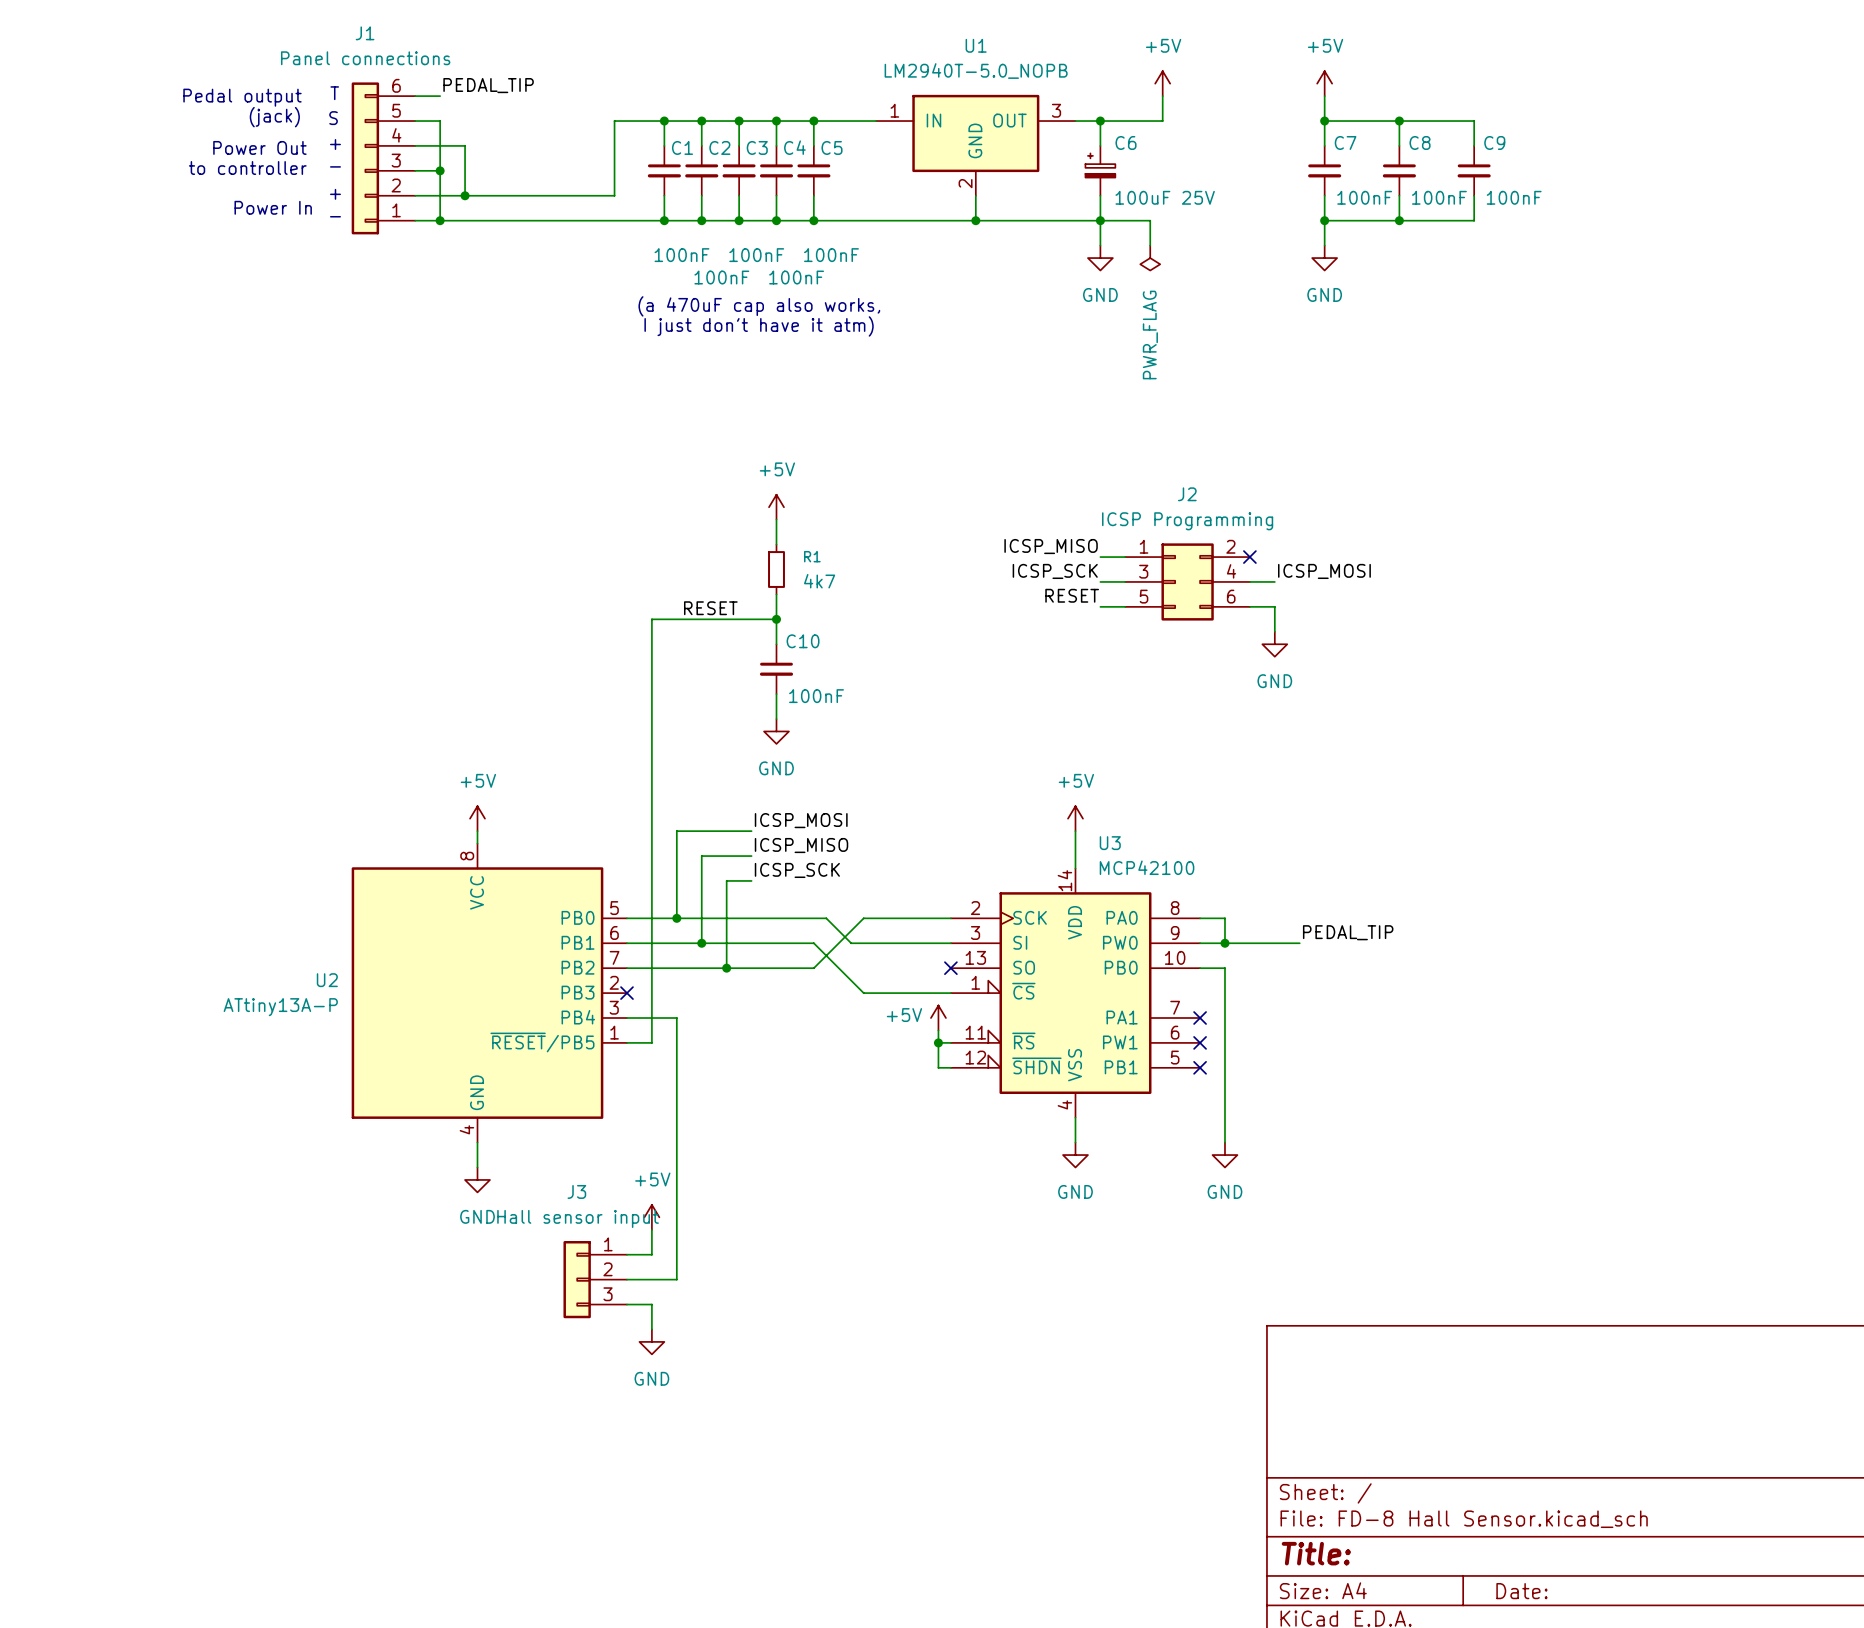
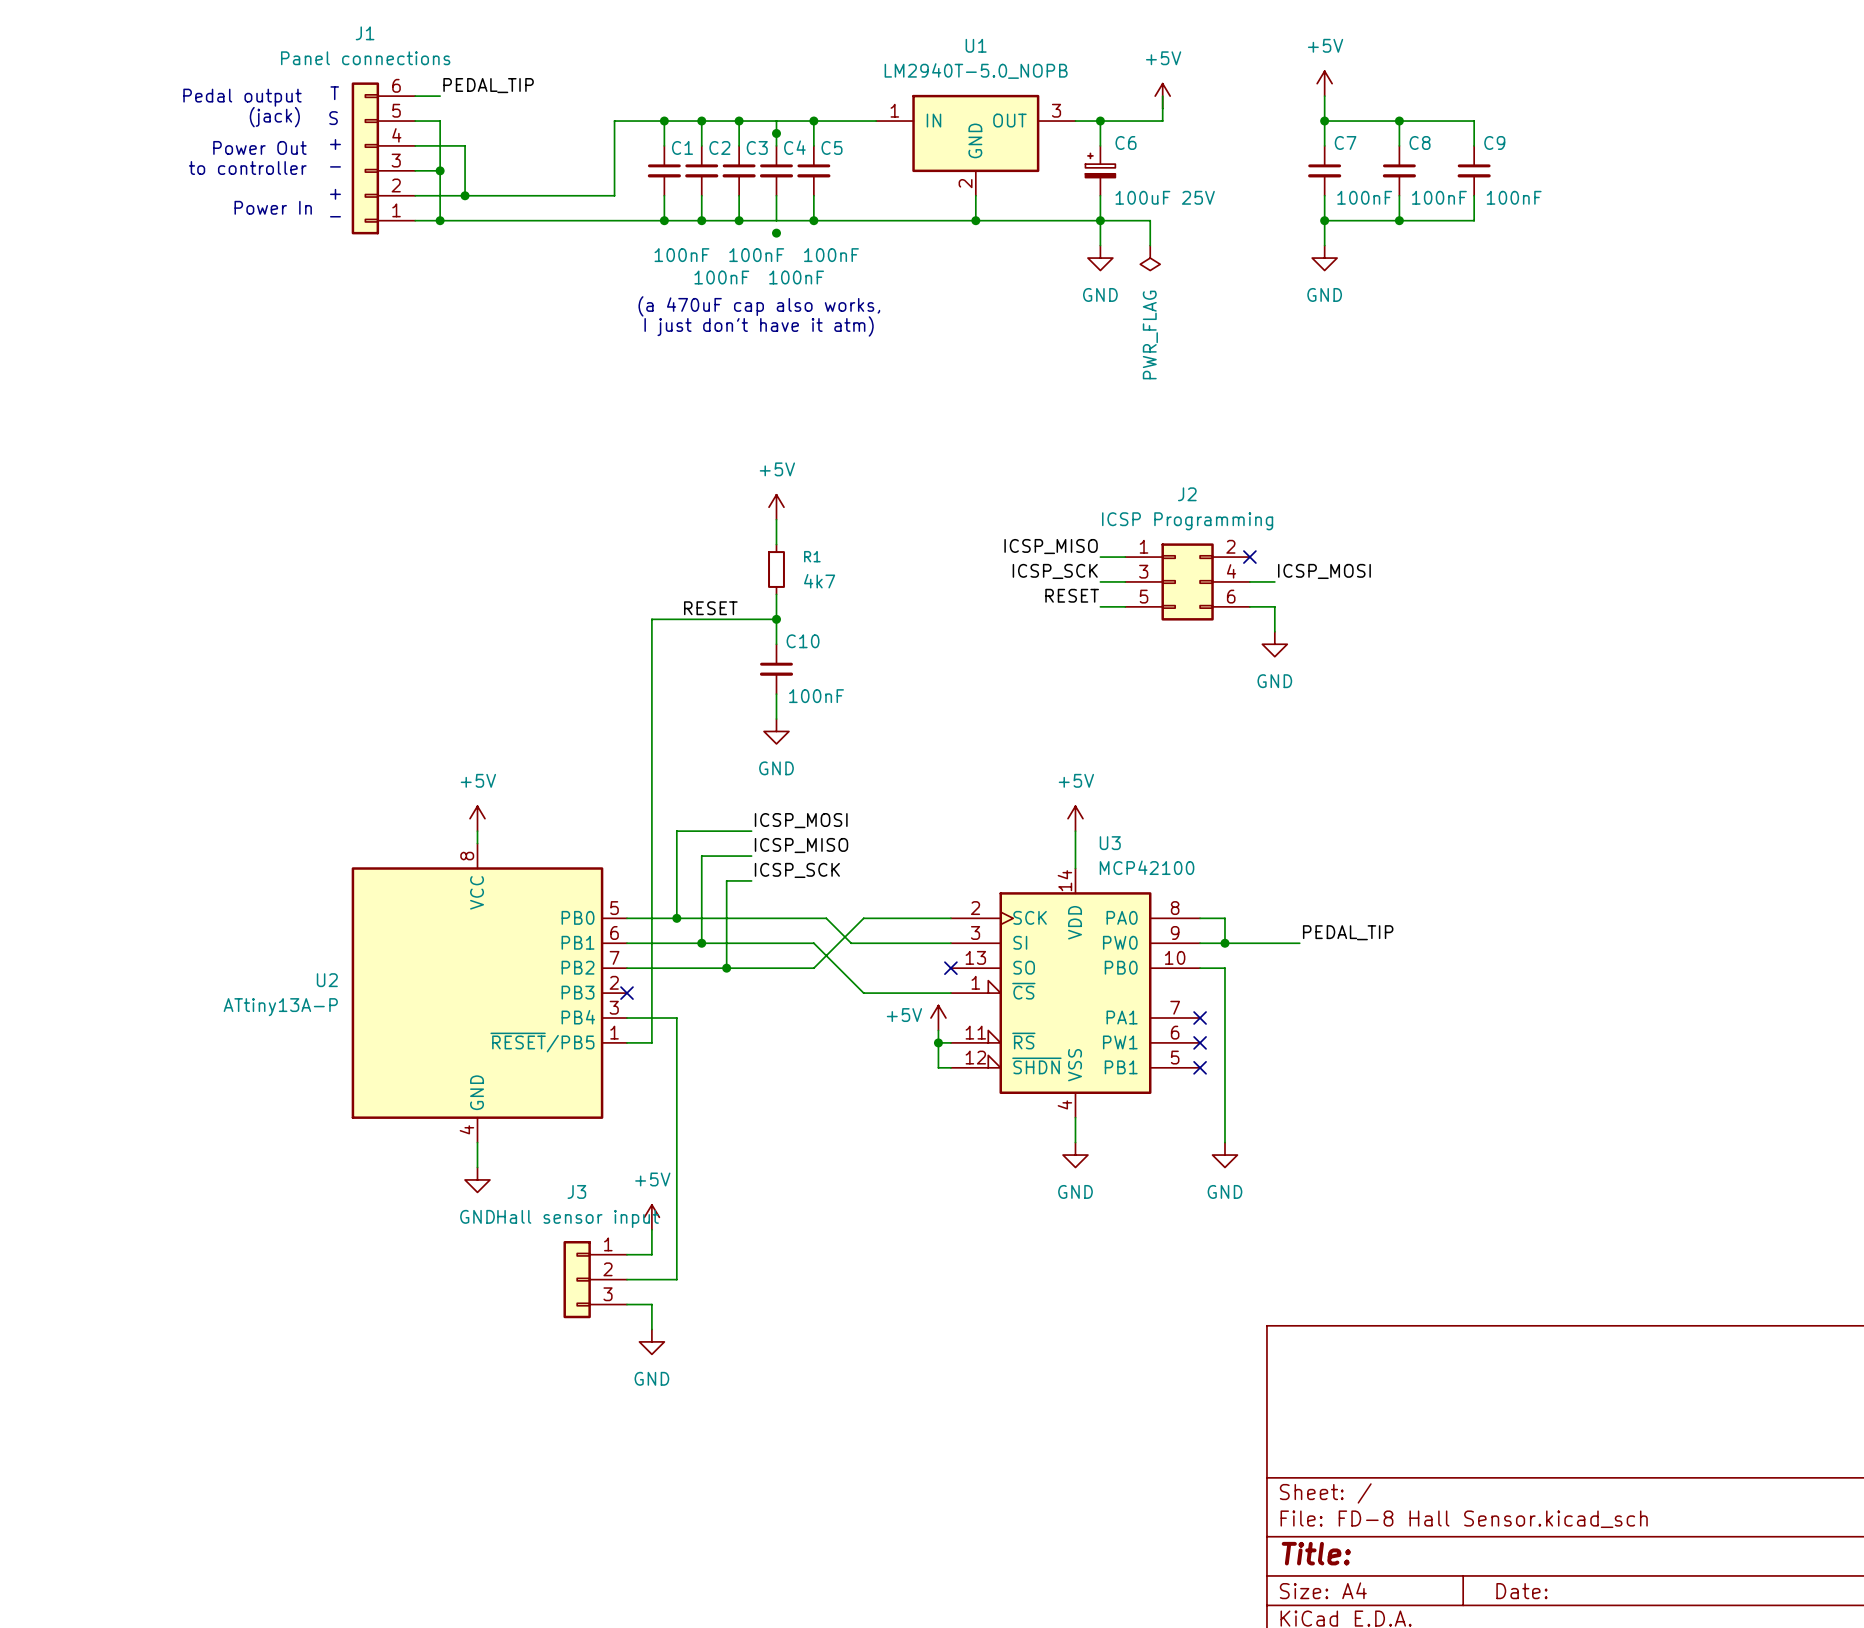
power symbol position: +5V (1162, 83) -> +5V (1162, 96)
junction position: (776, 121) -> (776, 133)
junction position: (776, 220) -> (776, 233)

